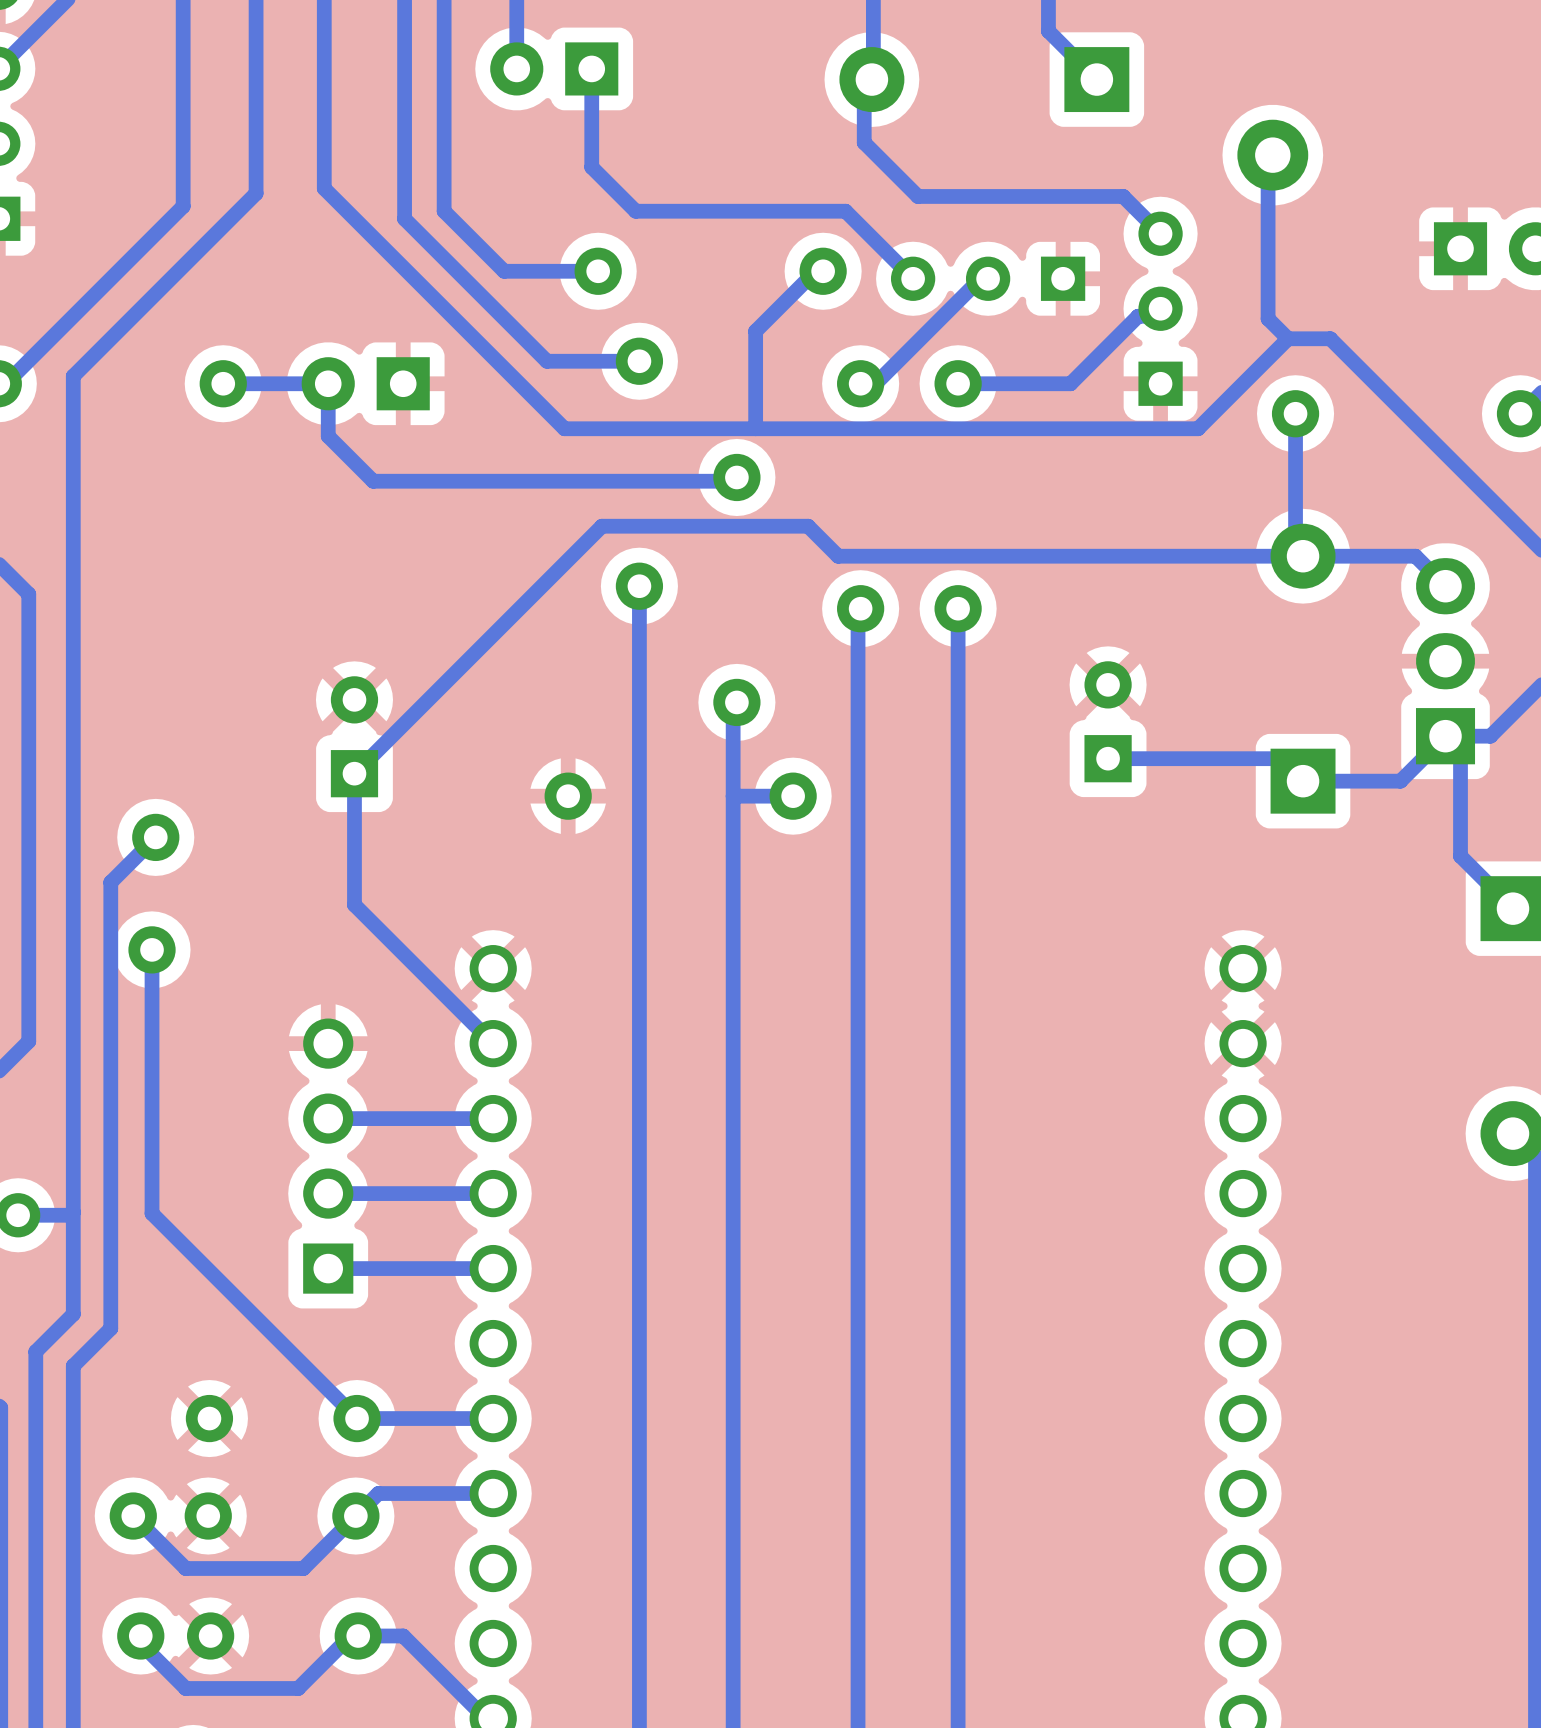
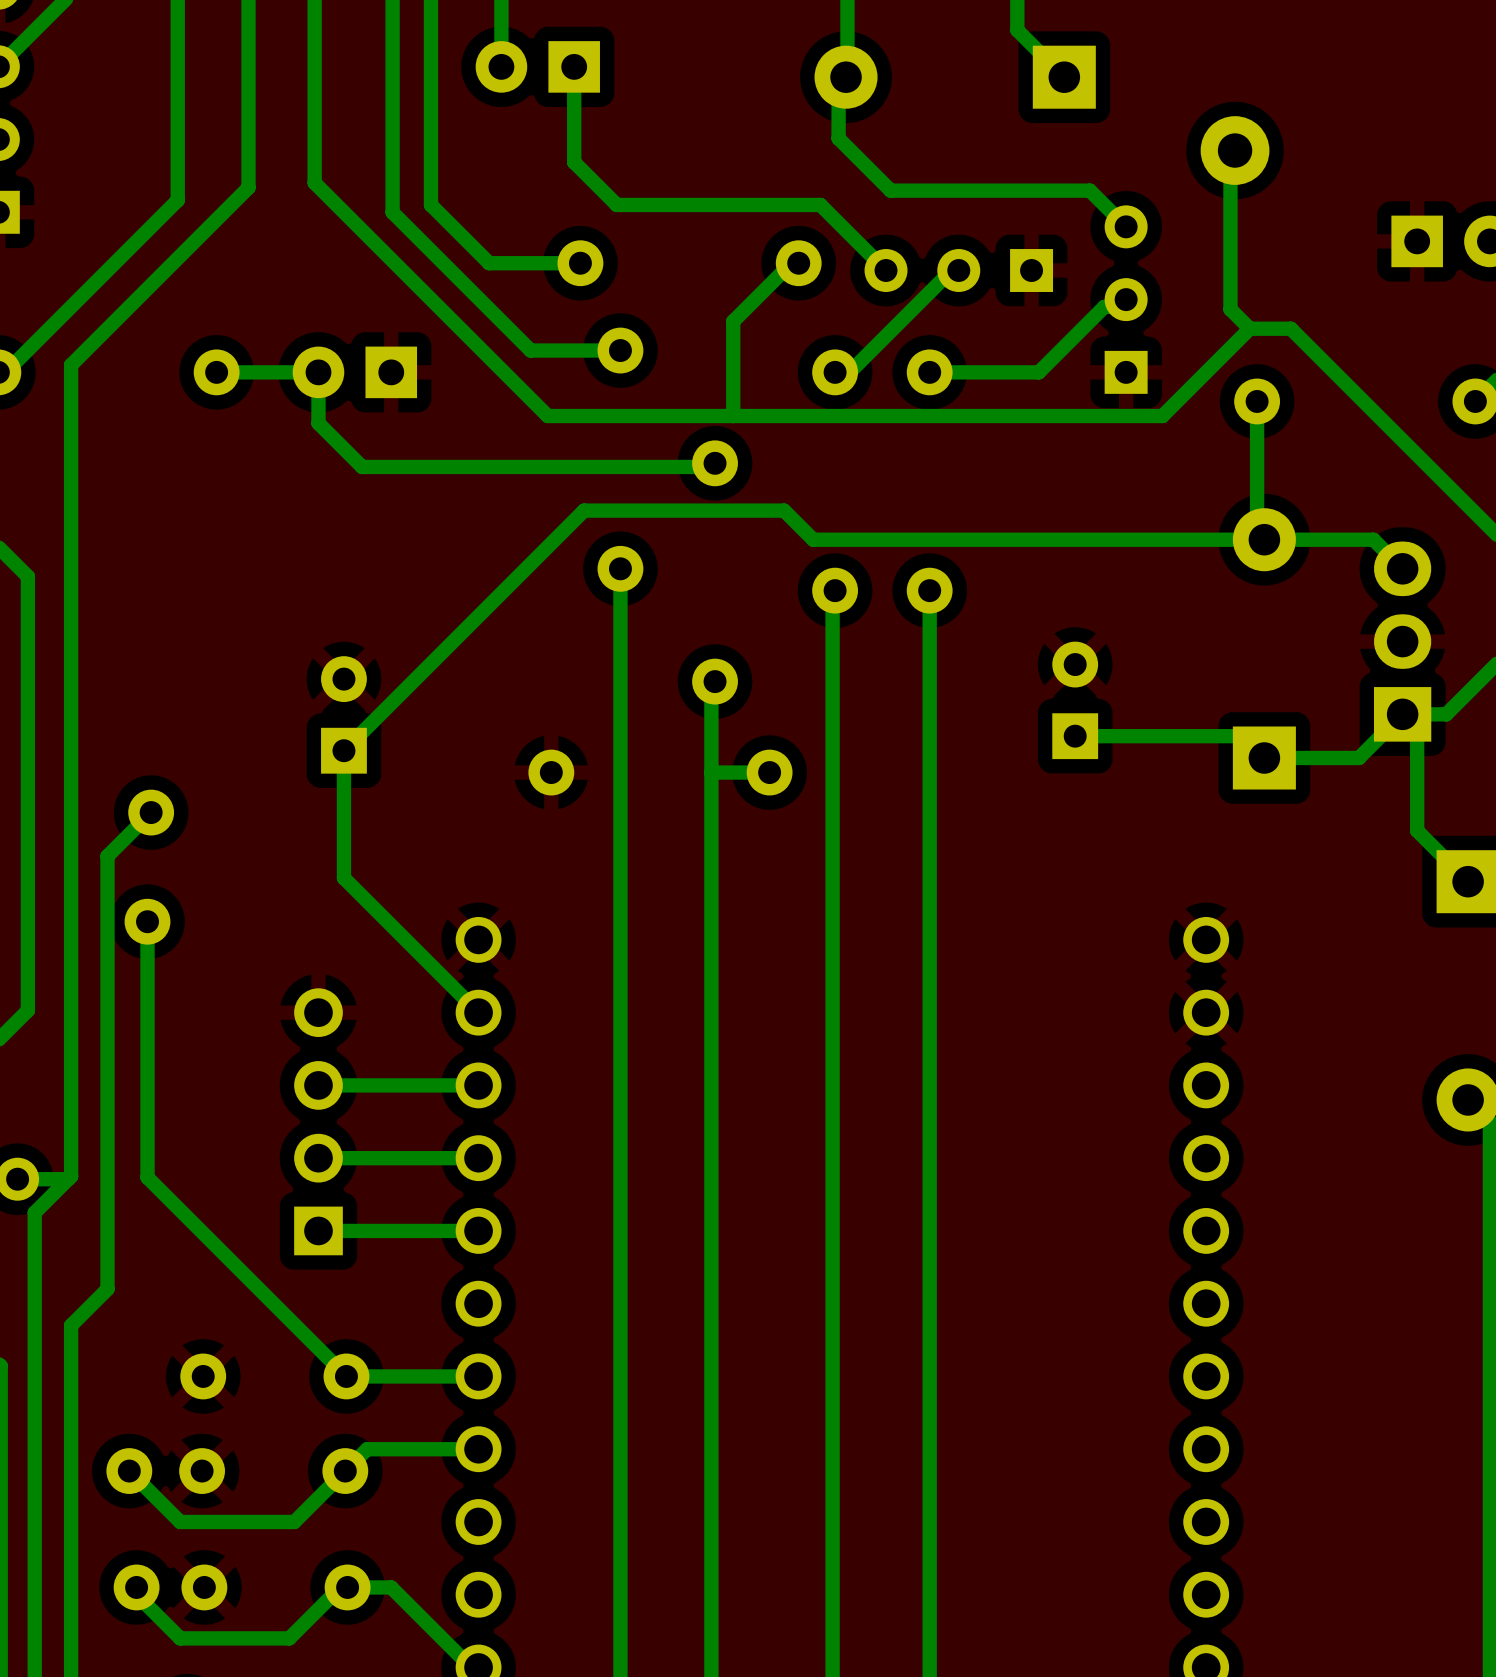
bottom track: (73, 1212) (73, 1314) (35, 1351) -> (68, 1179) (34, 1212) (34, 1311)

